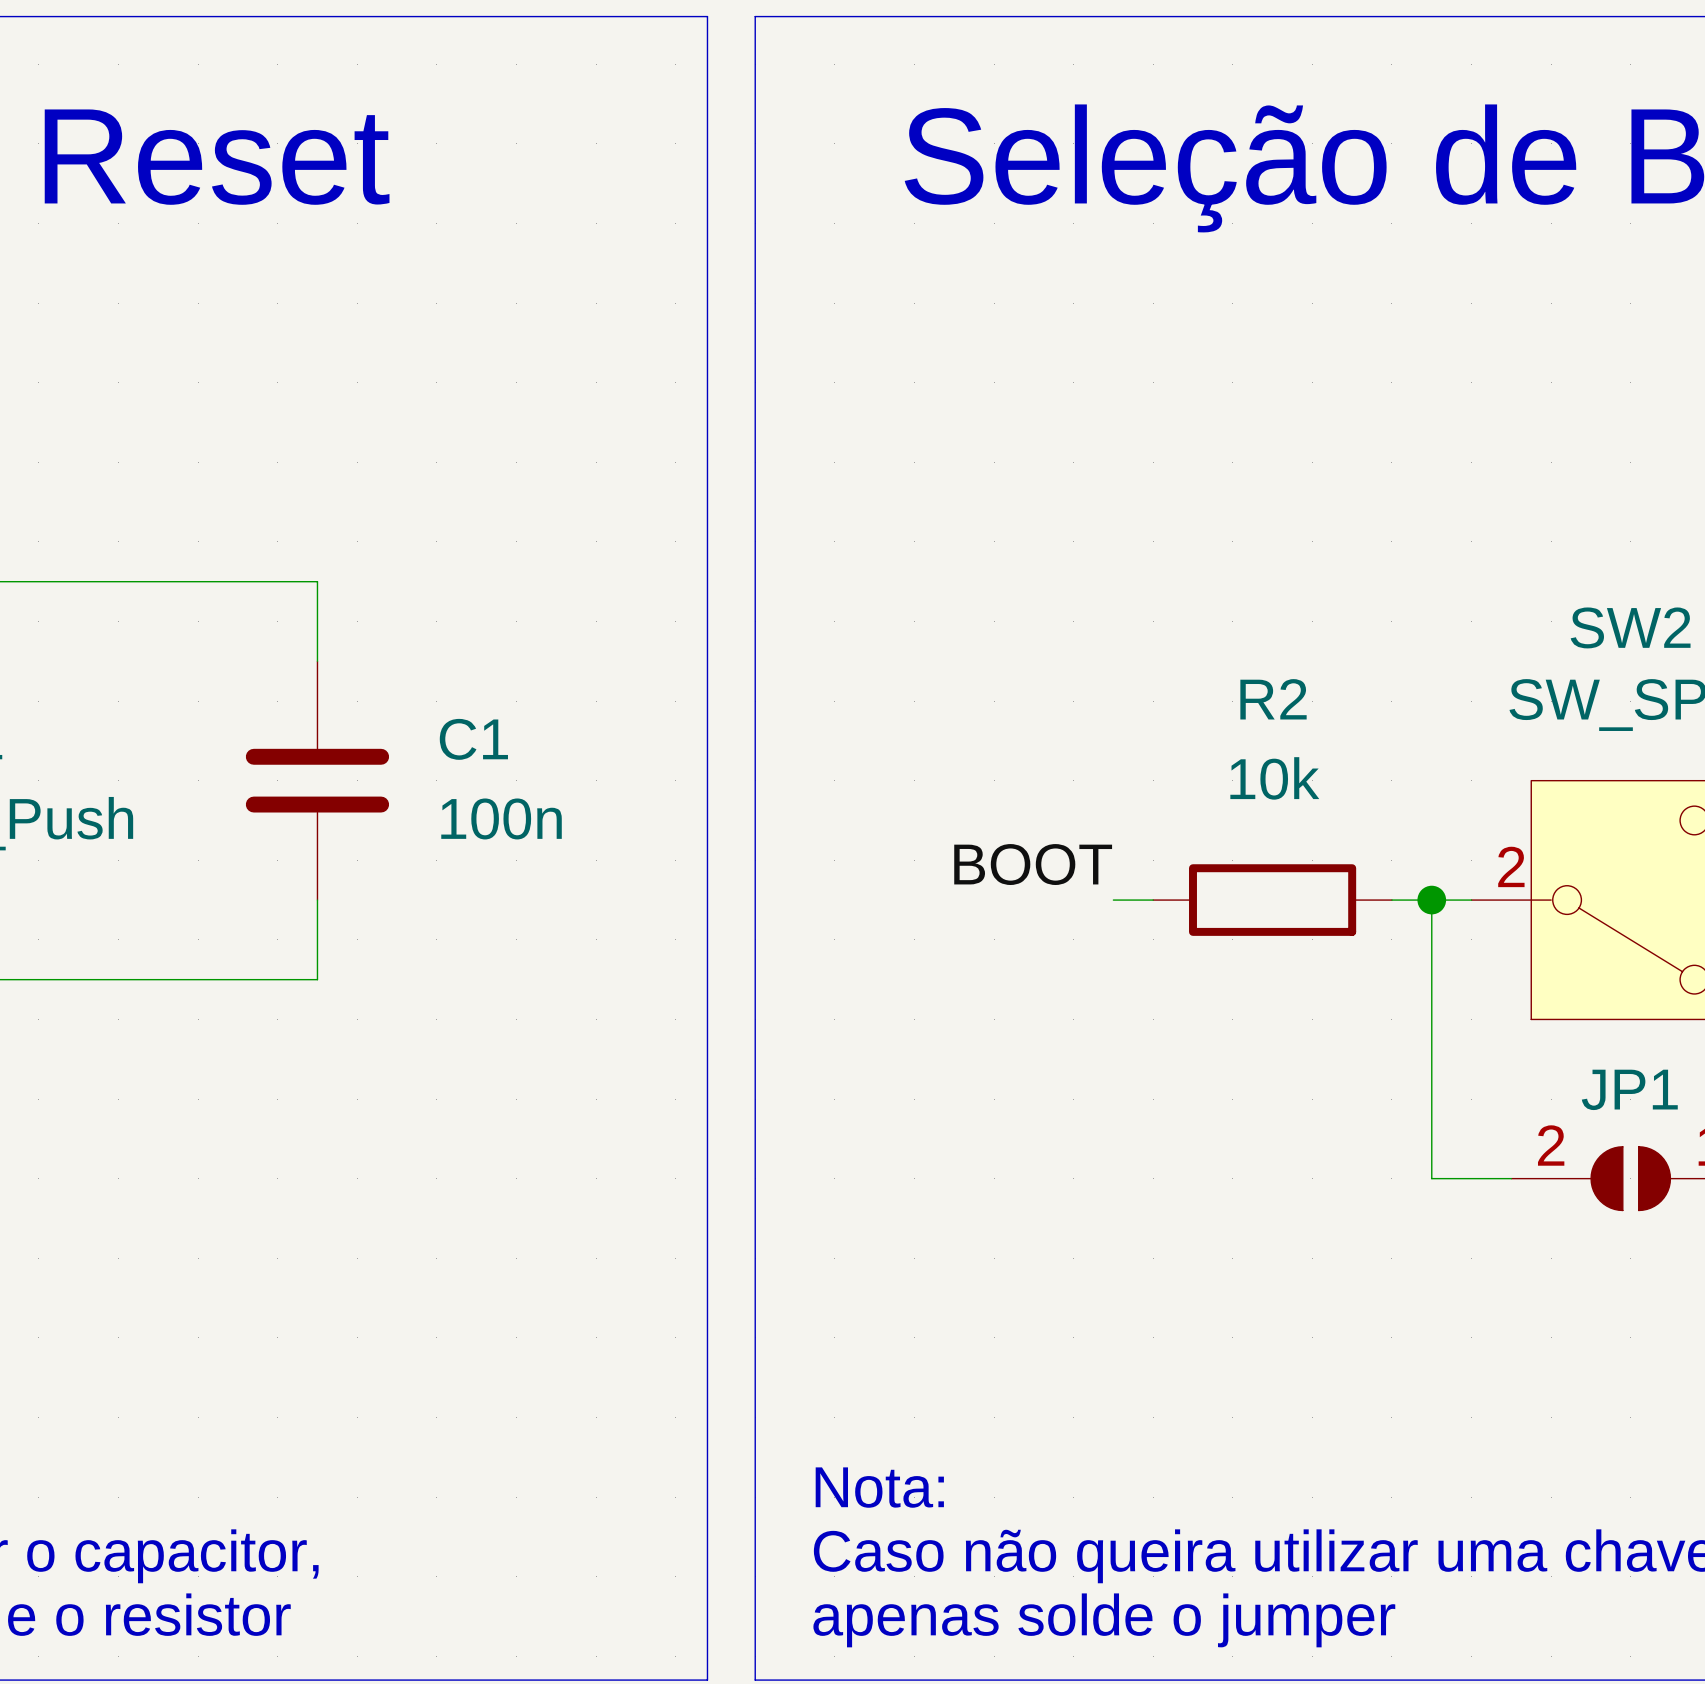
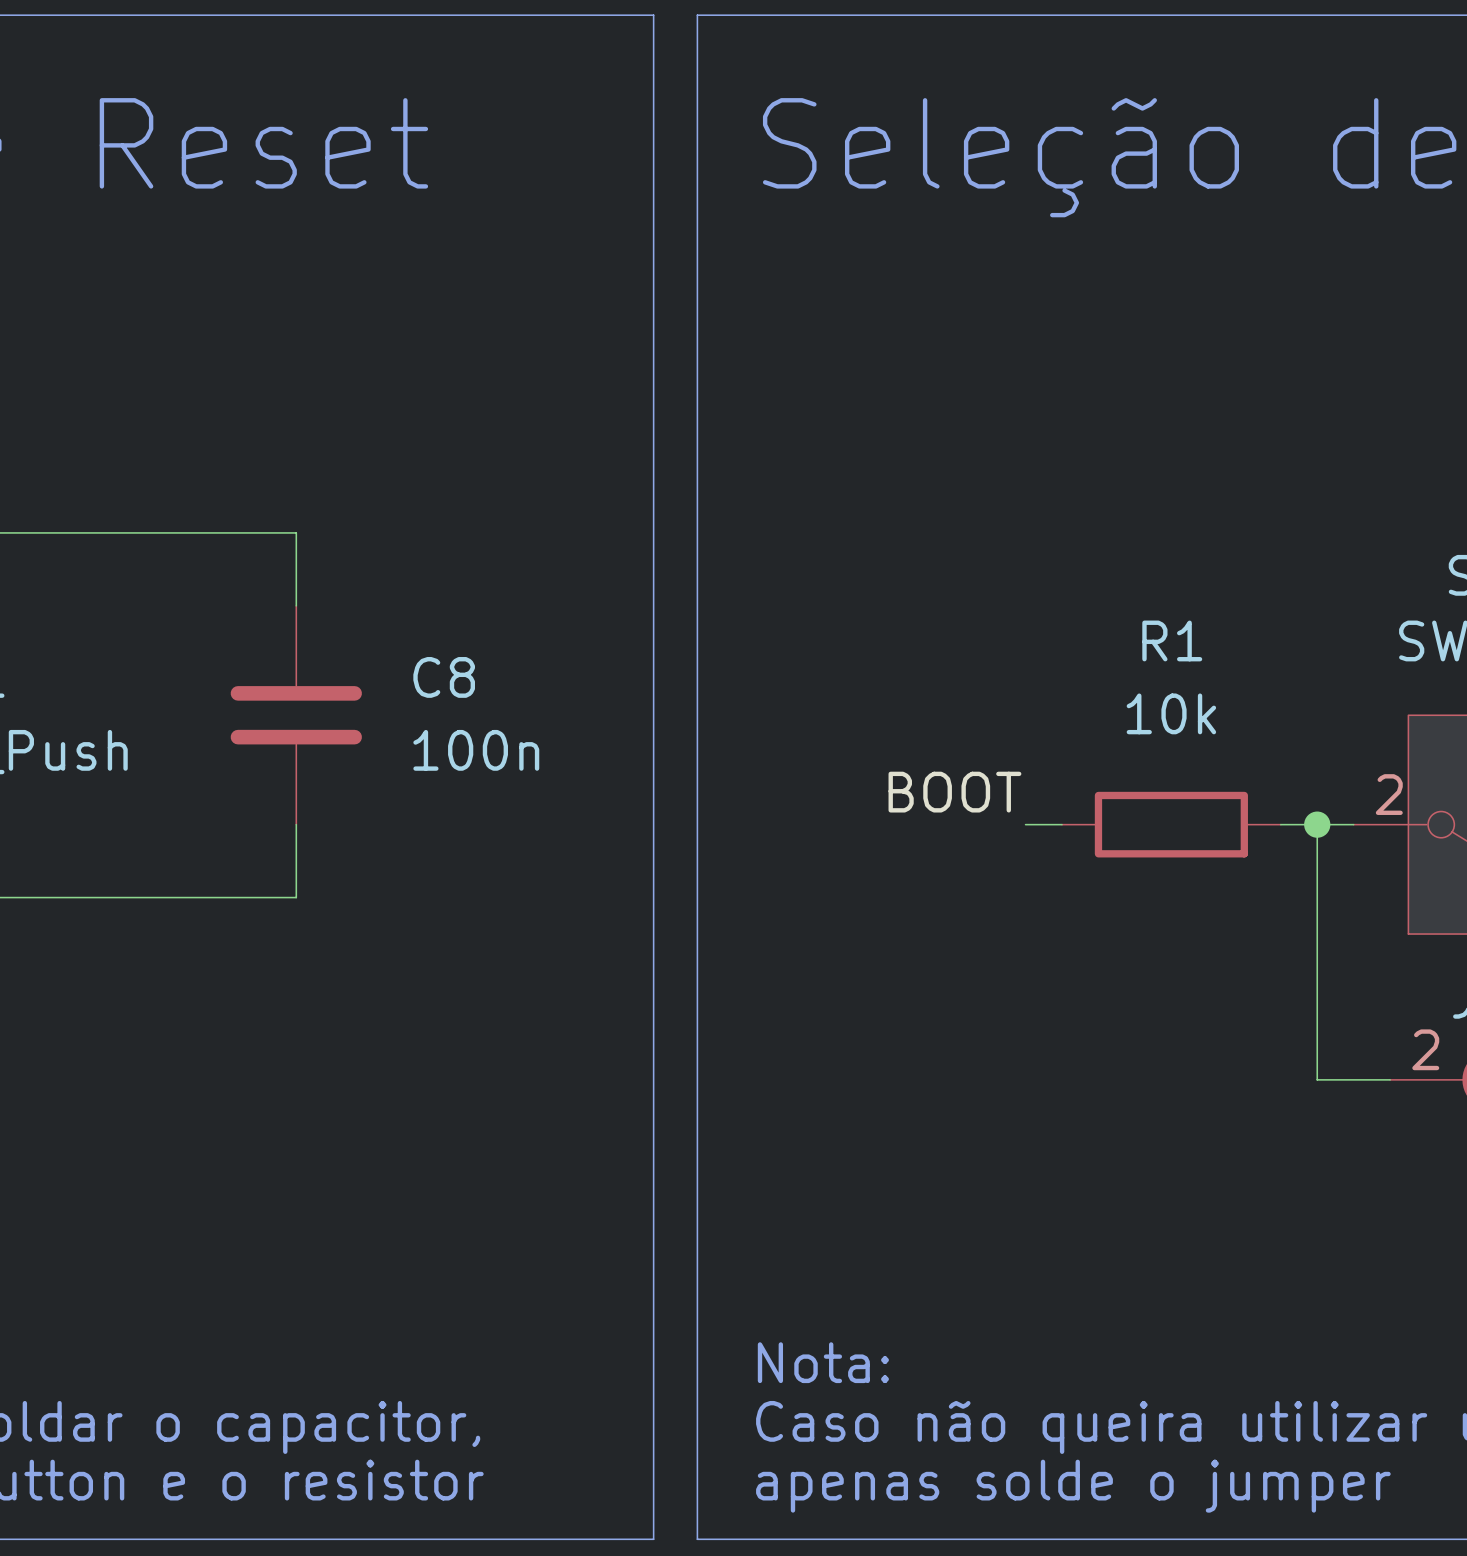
R2 name: R2 (1273, 699) -> R1 (1172, 640)
C1 name: C1 (473, 739) -> C8 (444, 677)

